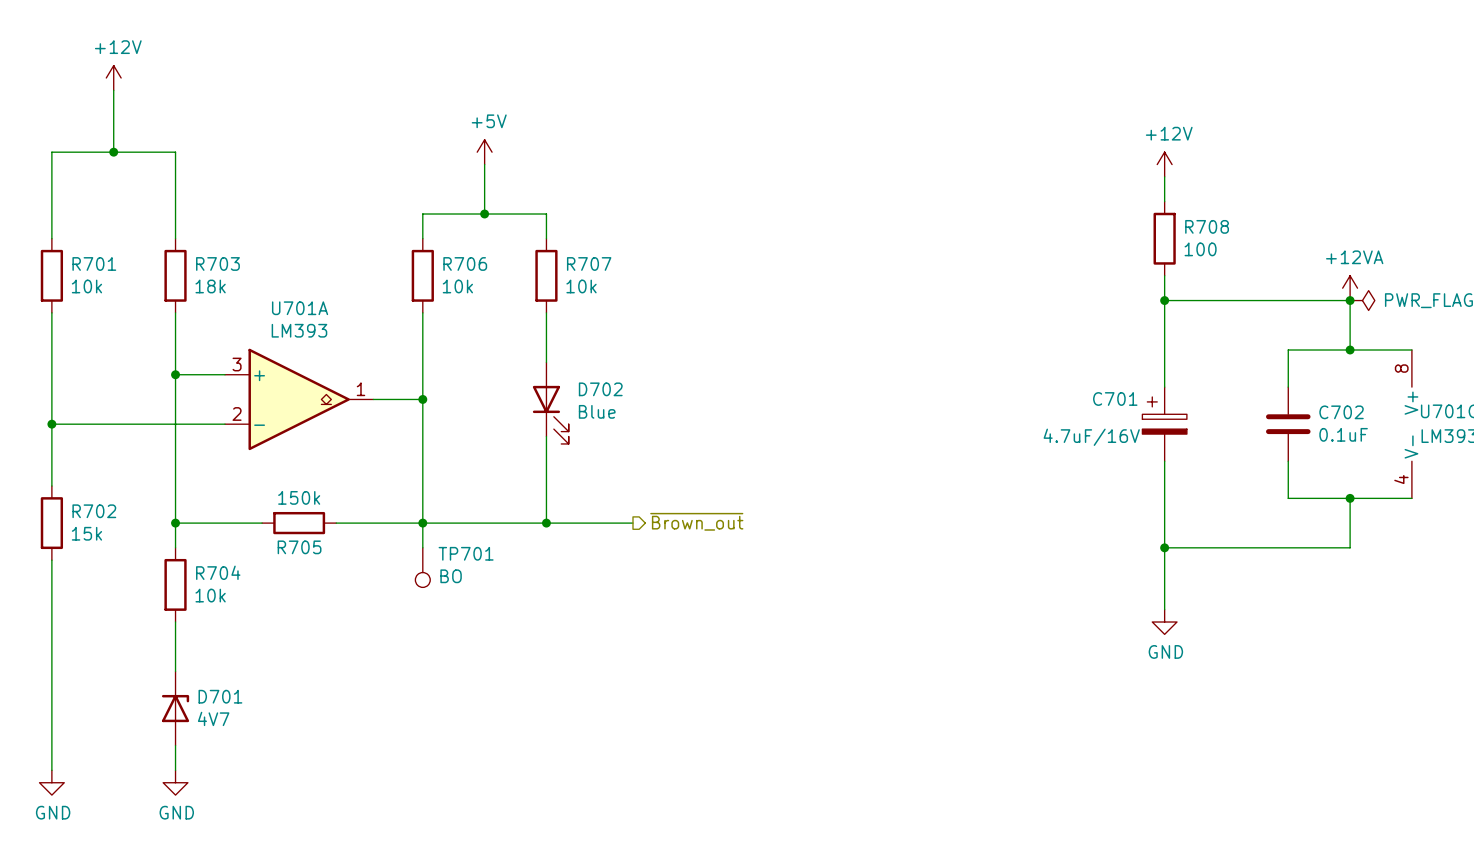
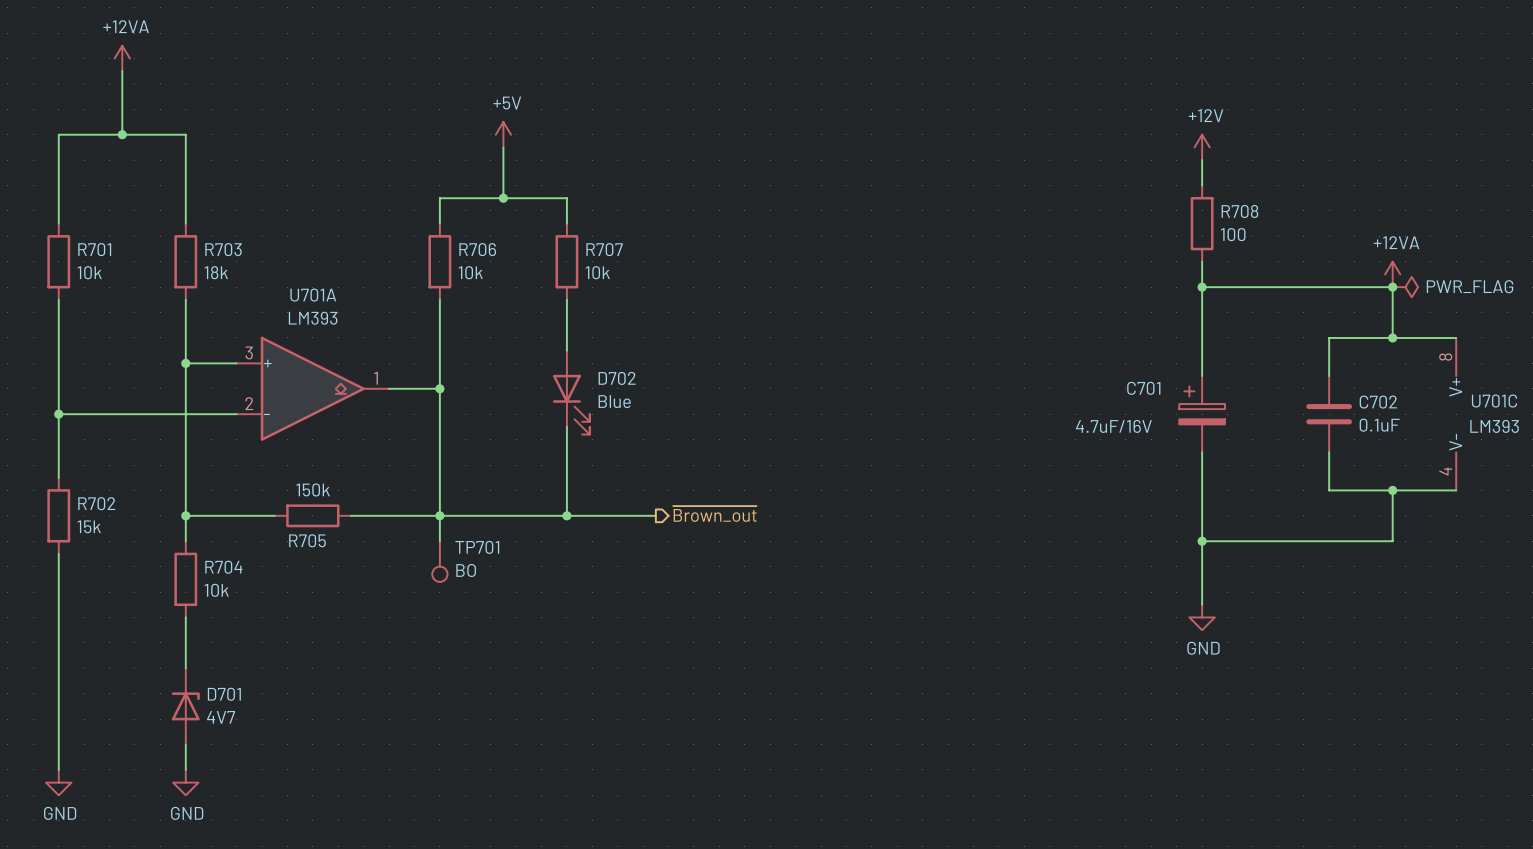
power symbol: +12V (113, 77) -> +12VA (122, 58)

